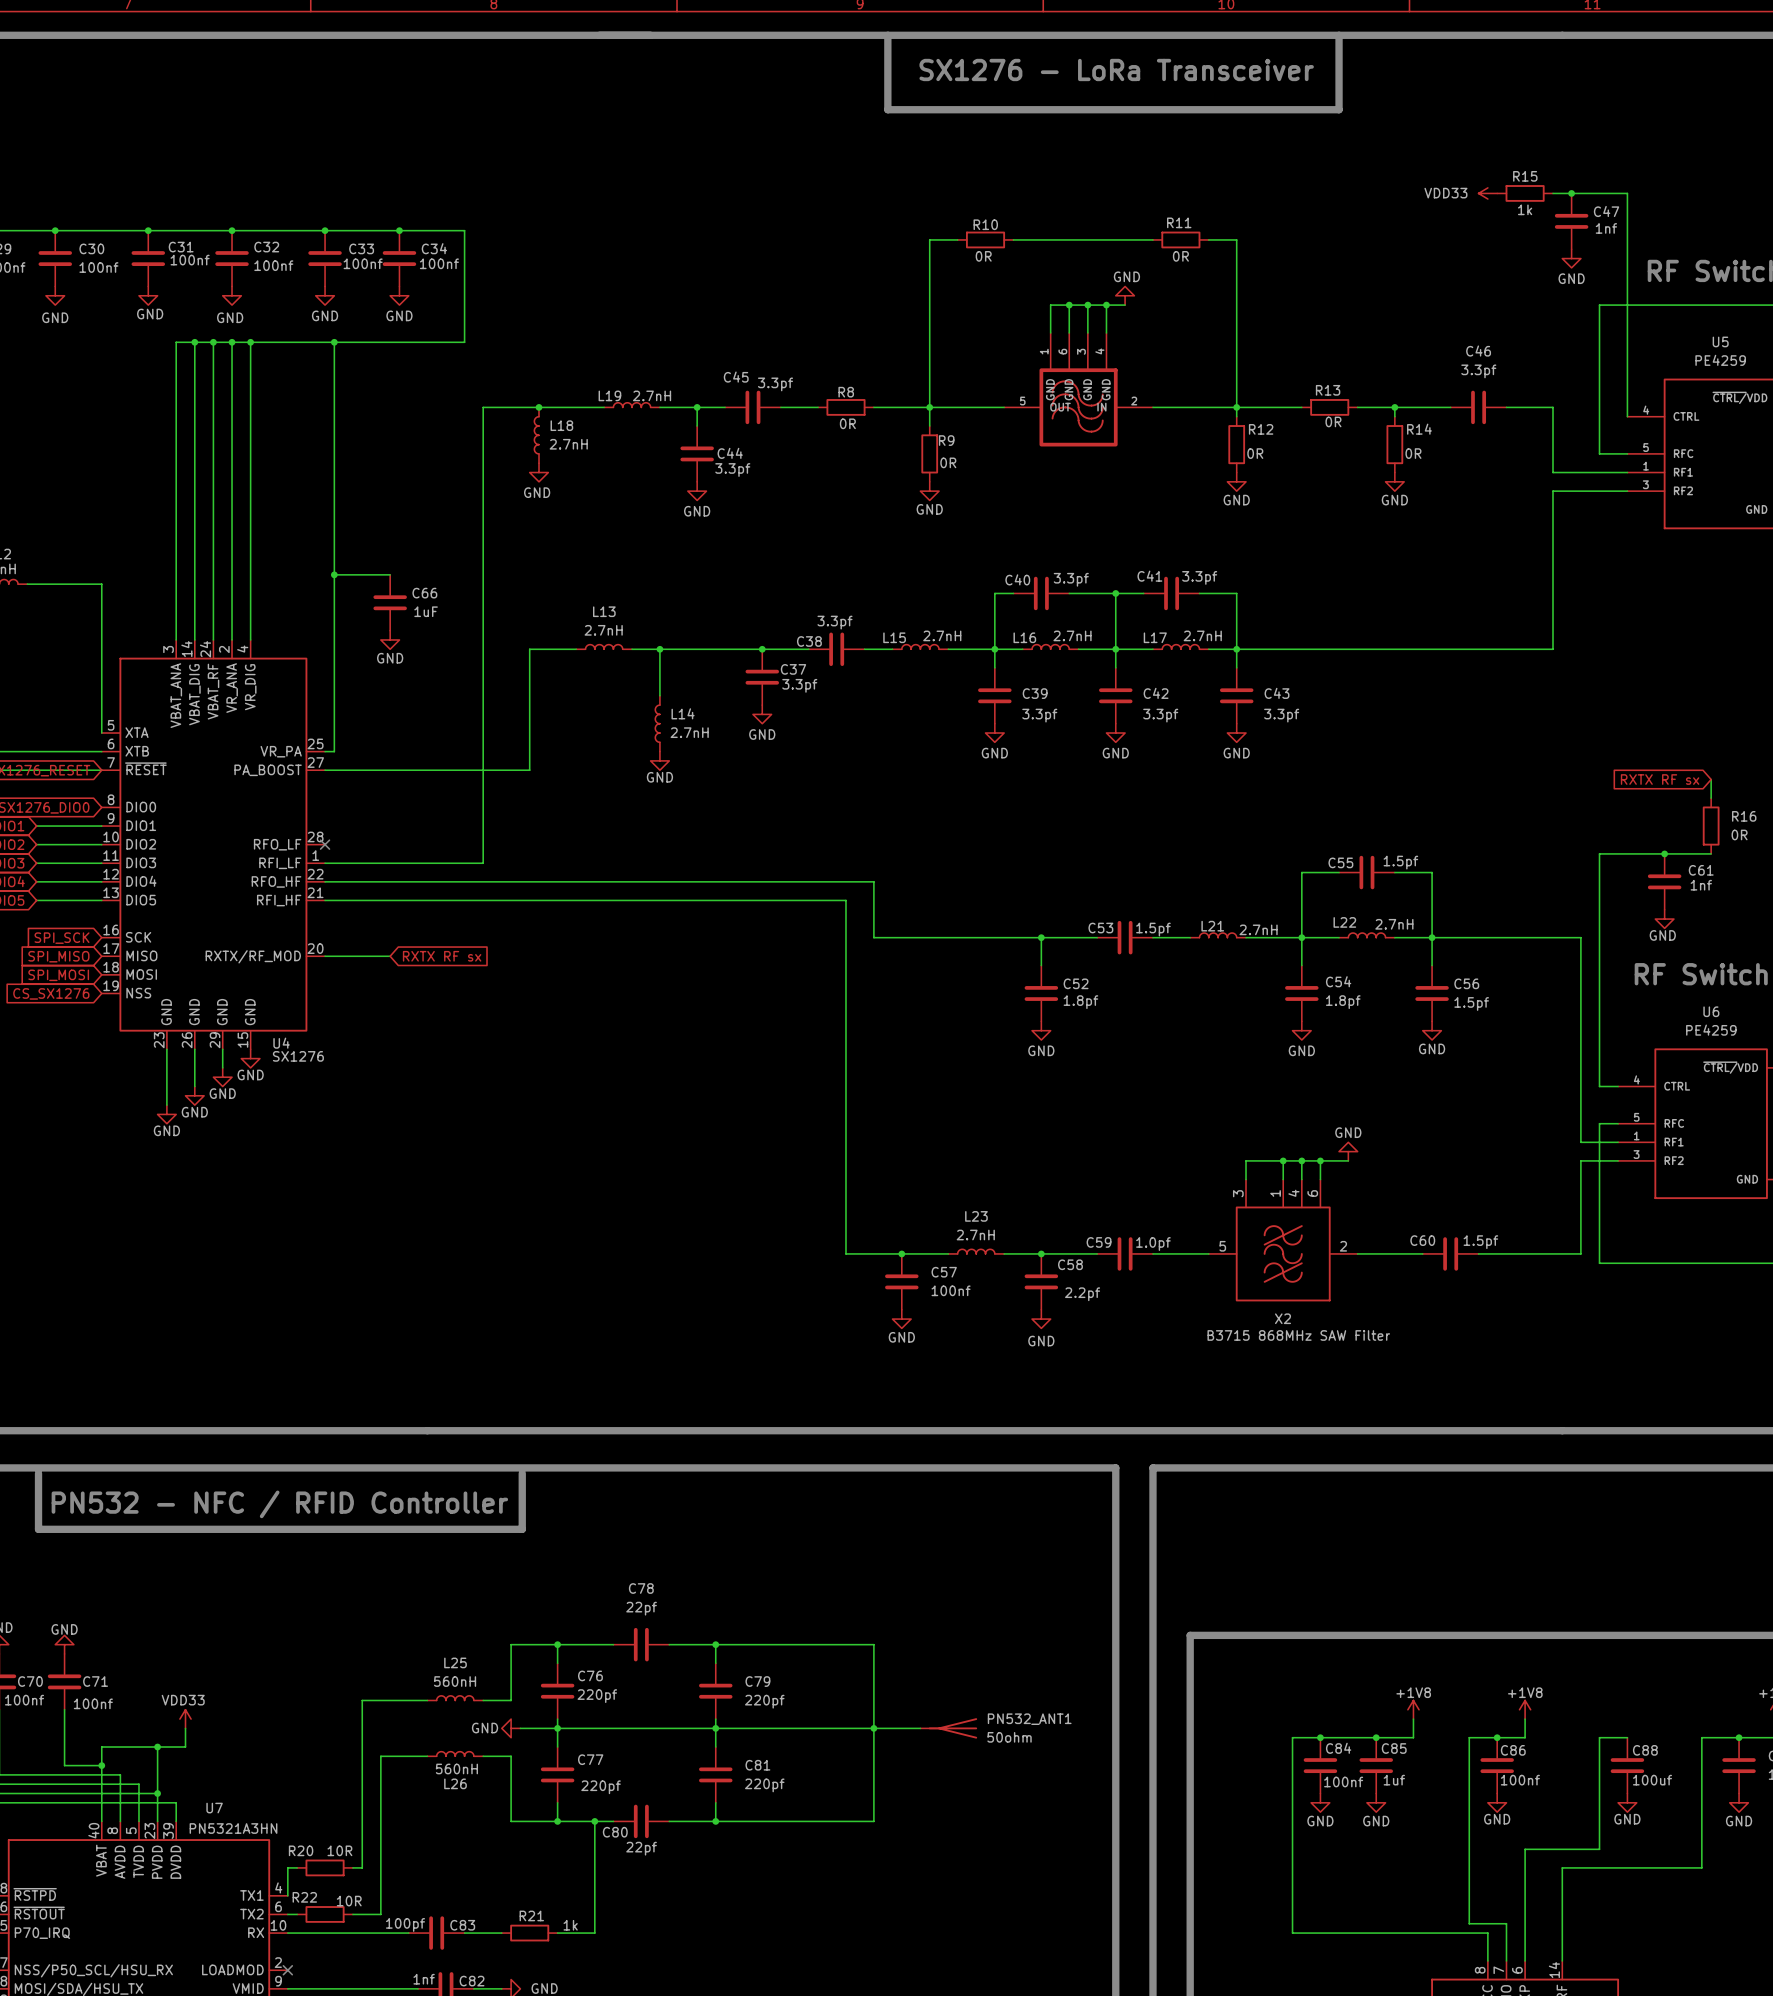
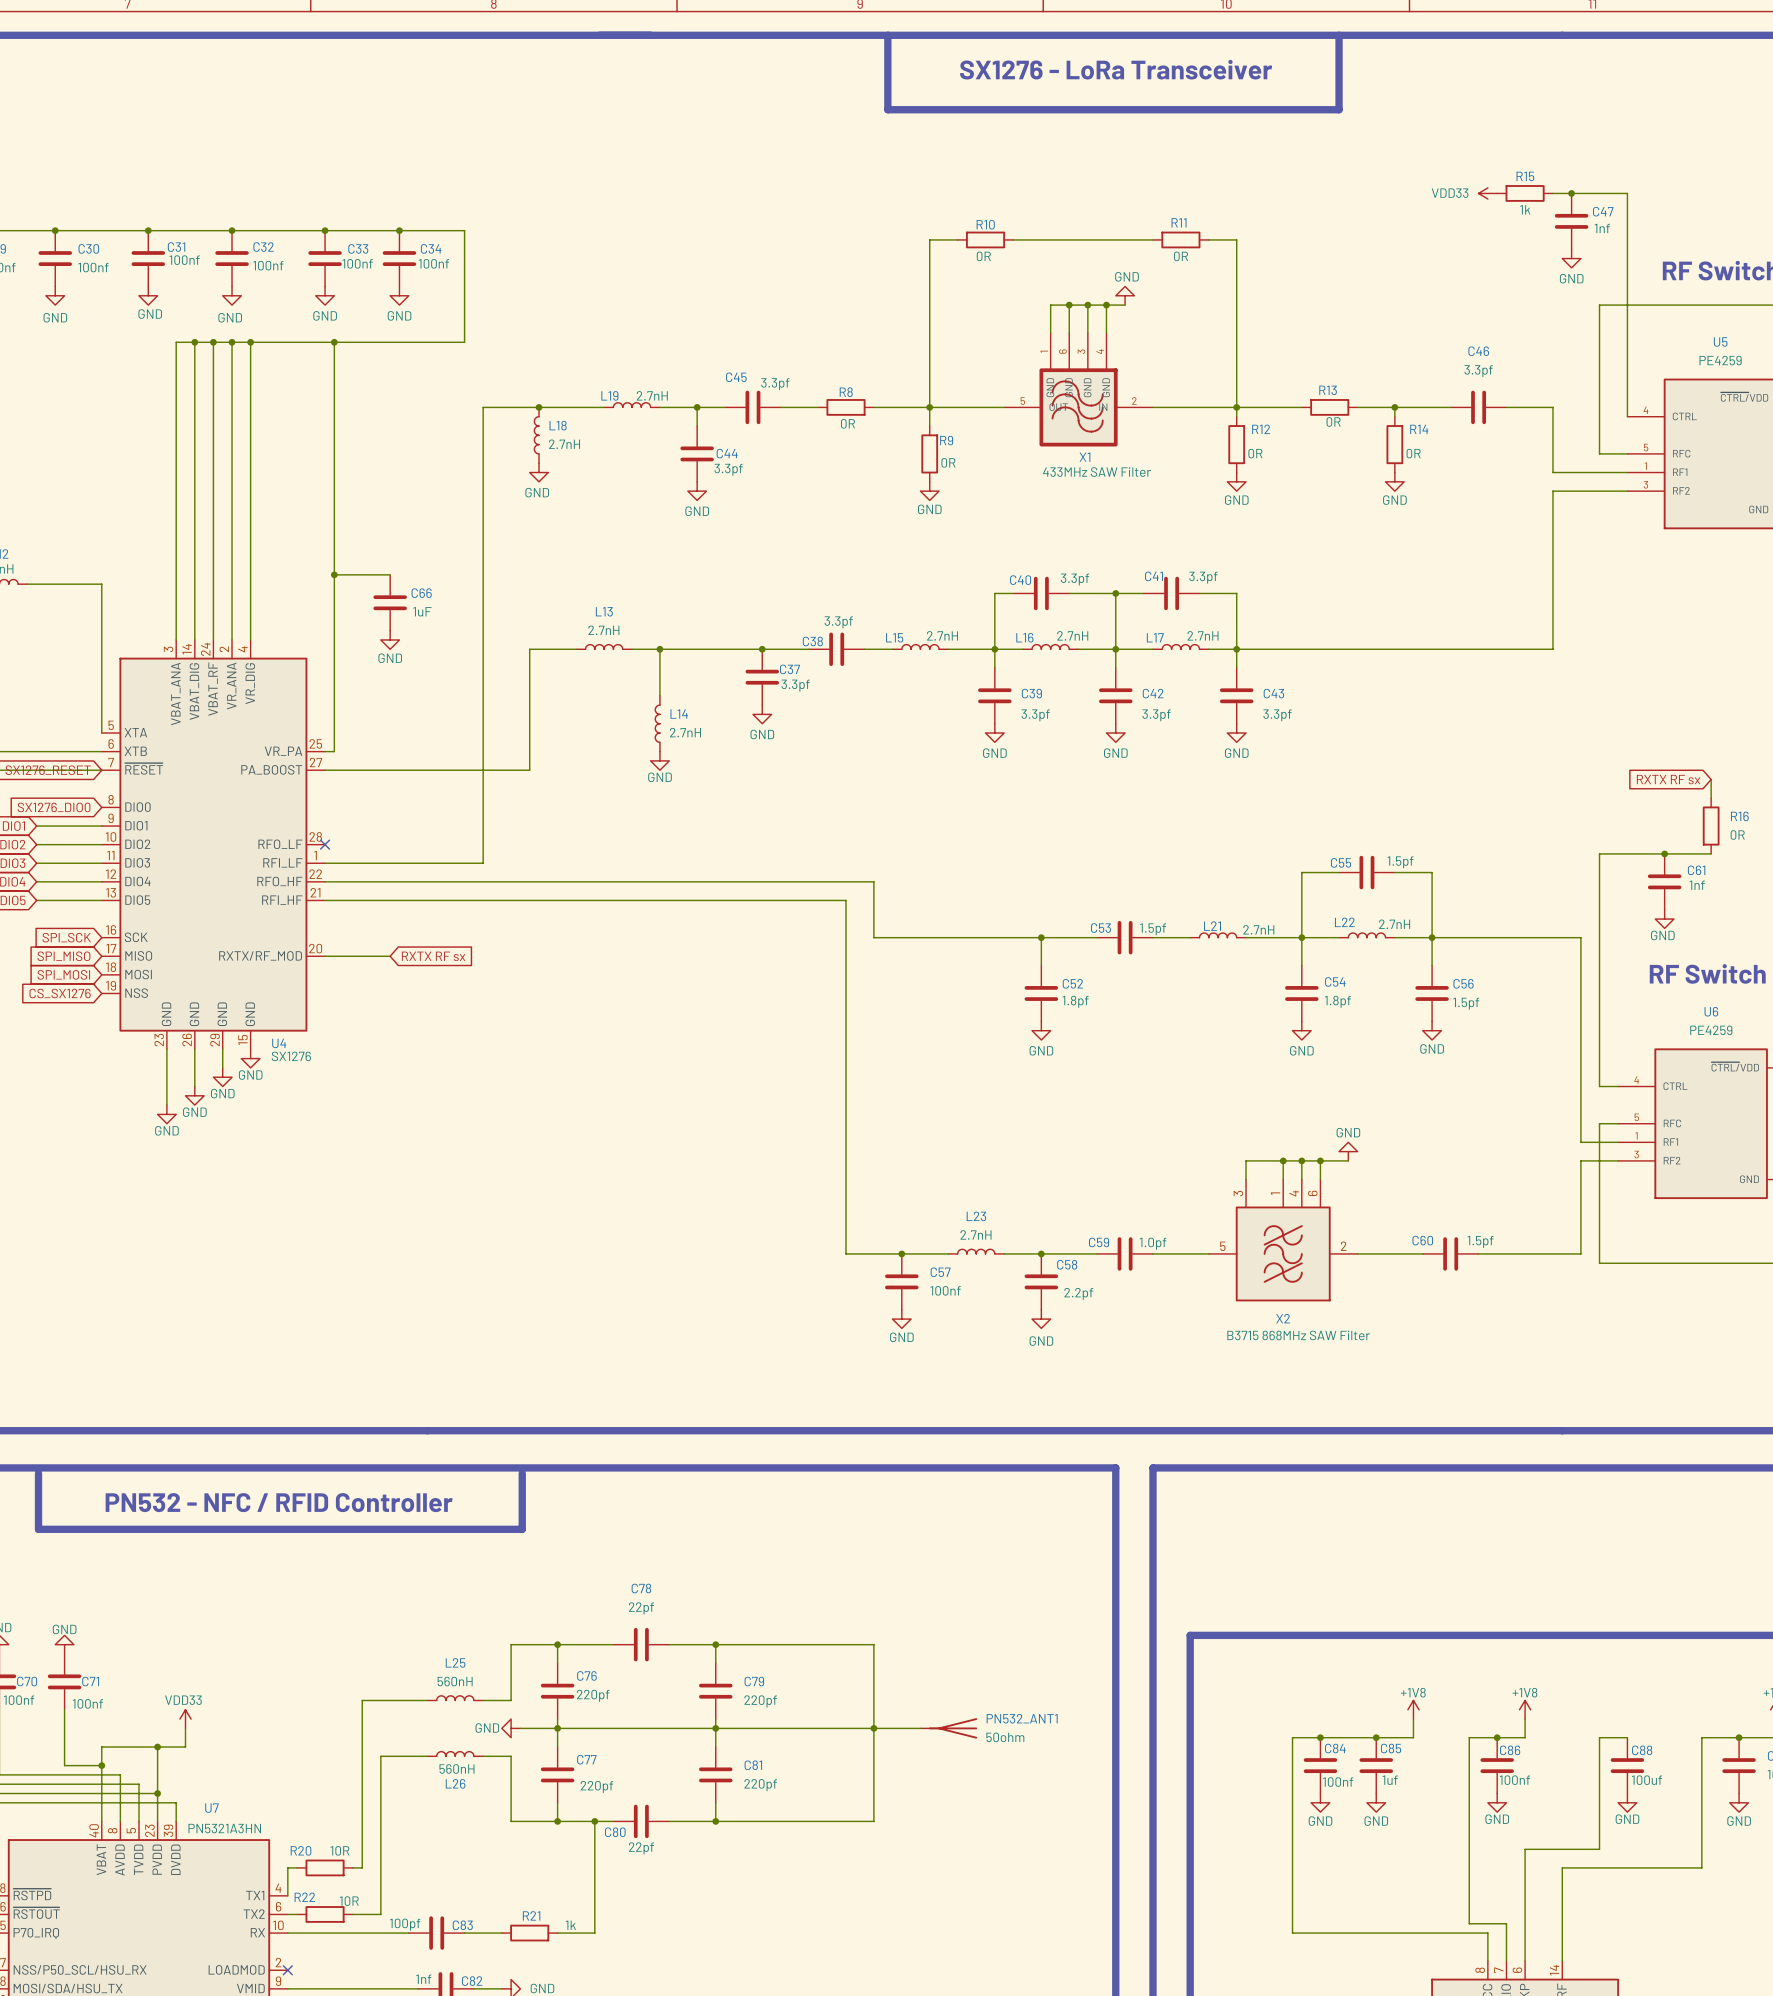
X1 name: none -> X1 (1084, 457)
X1 value: none -> 433MHz SAW Filter (1097, 472)

